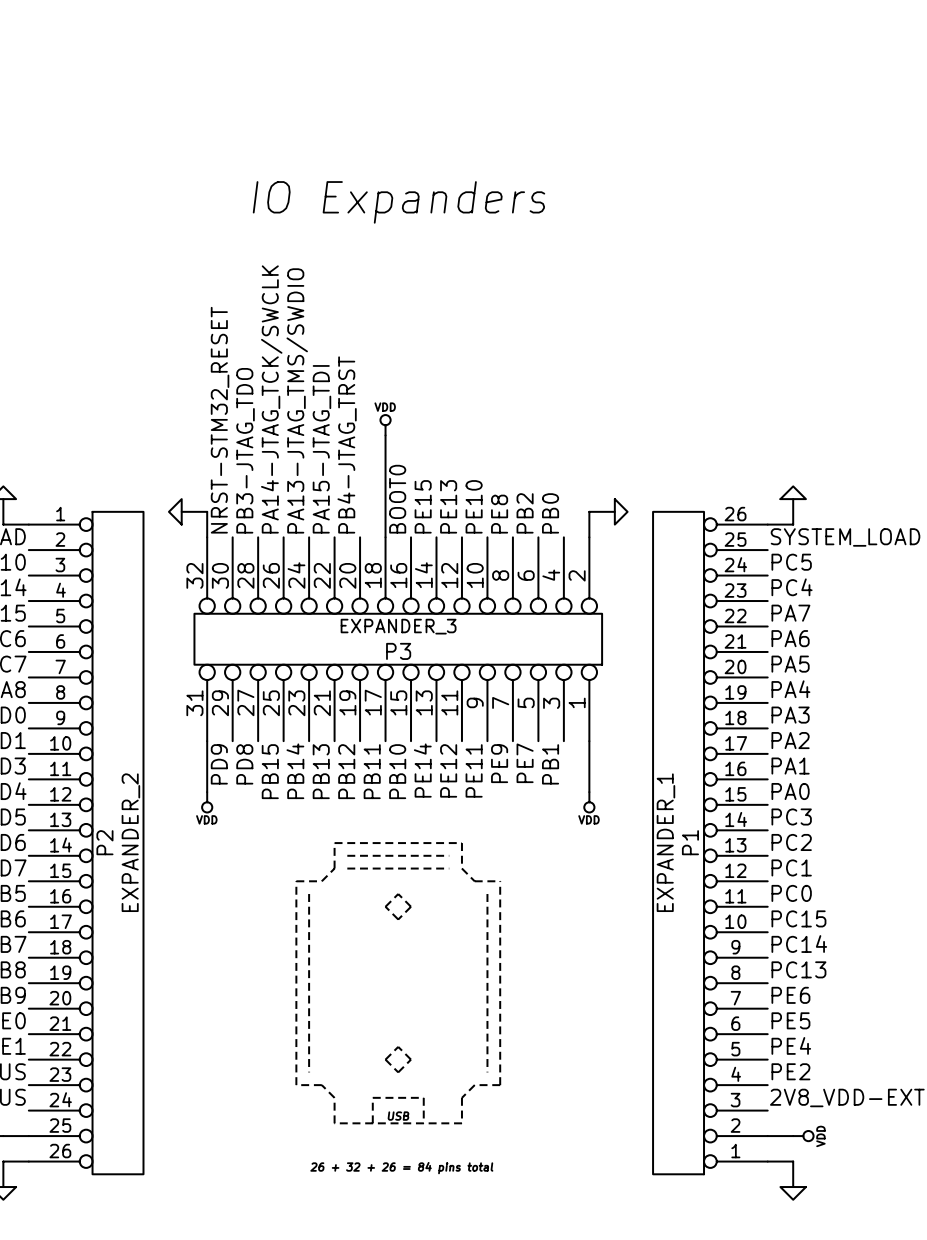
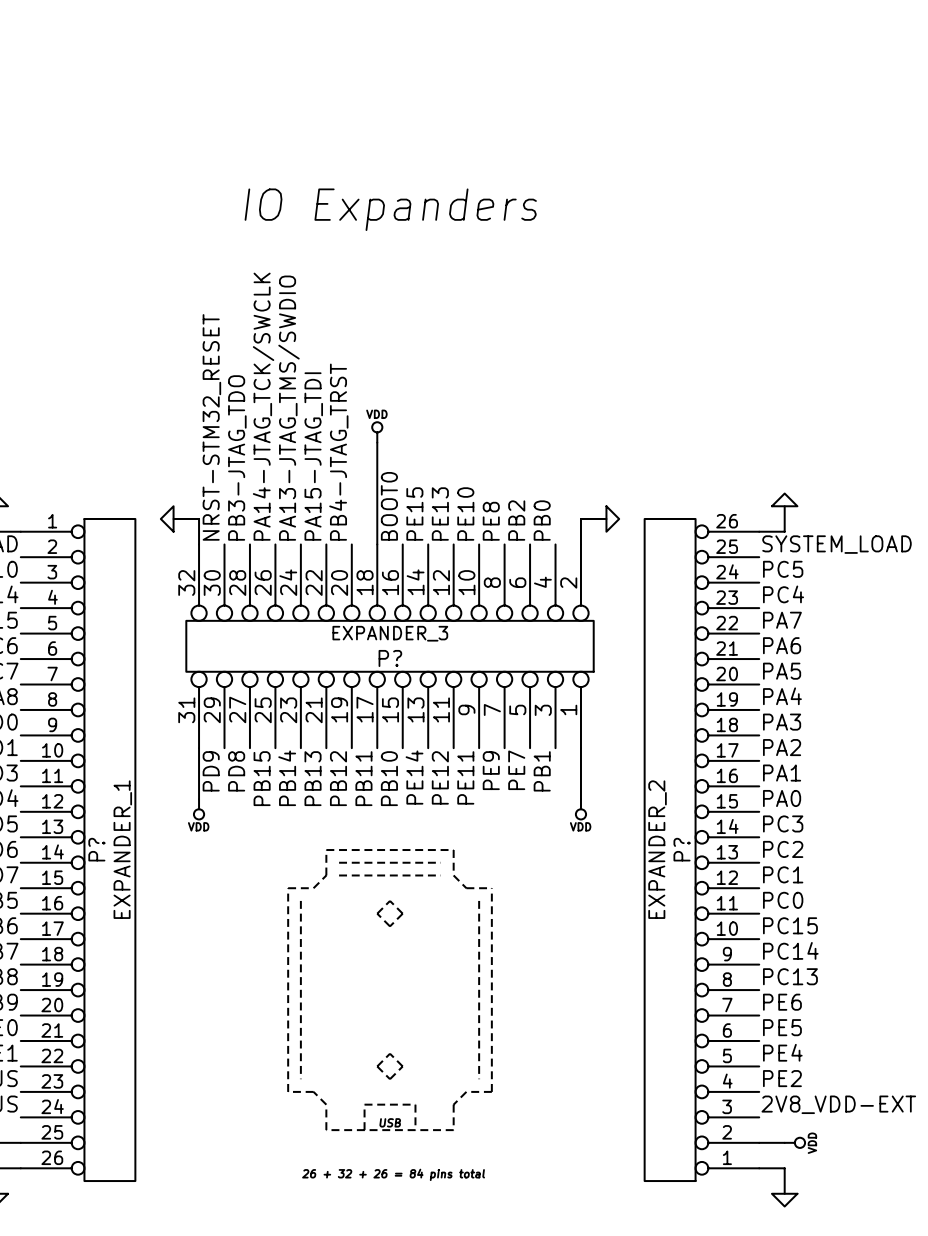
P3 name: P3 (398, 651) -> P? (390, 658)
P2 name: P2 (104, 842) -> P? (96, 849)
P2 value: EXPANDER_2 (130, 842) -> EXPANDER_1 (122, 849)
P1 value: EXPANDER_1 (665, 842) -> EXPANDER_2 (657, 849)
P1 name: P1 (690, 842) -> P? (682, 849)

